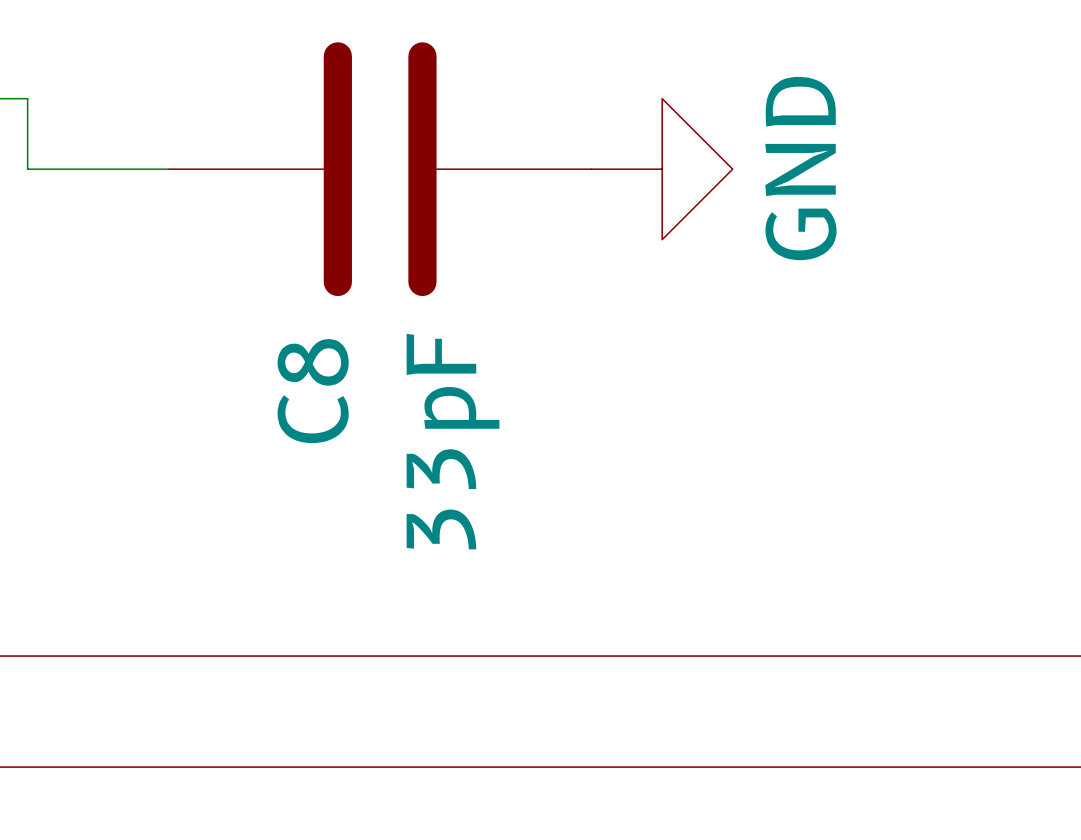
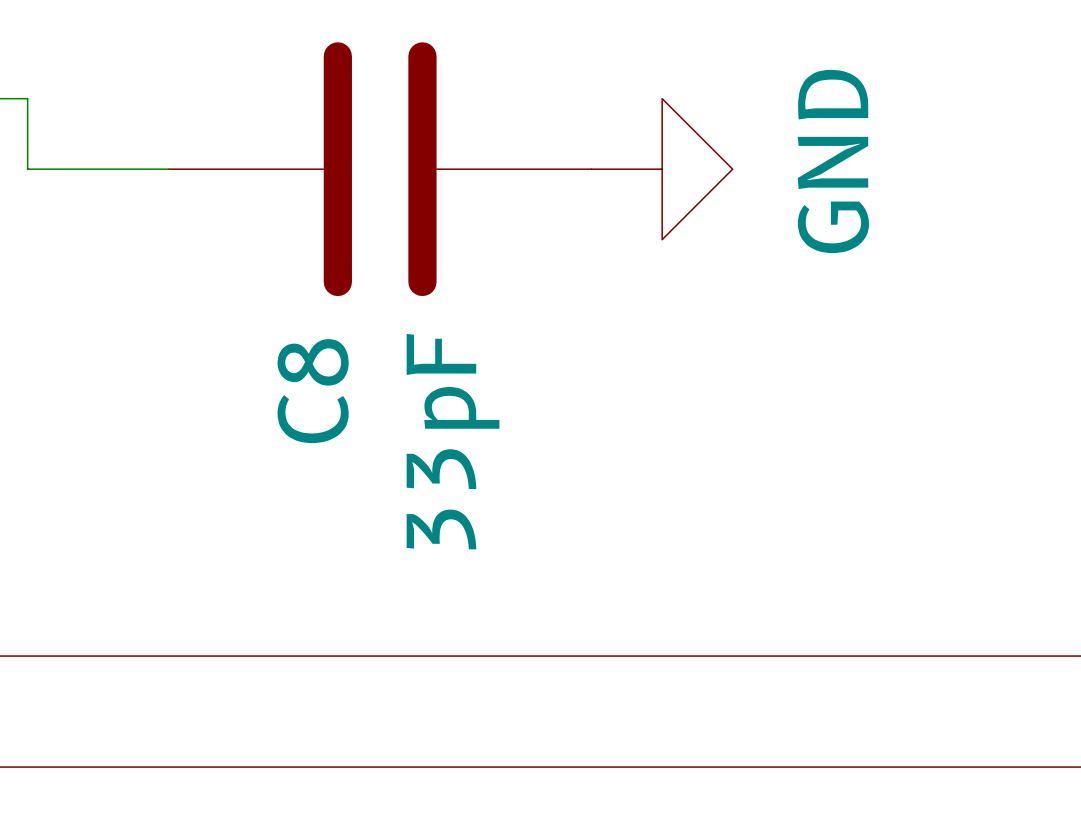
power symbol text position: GND (800, 168) -> GND (833, 161)

